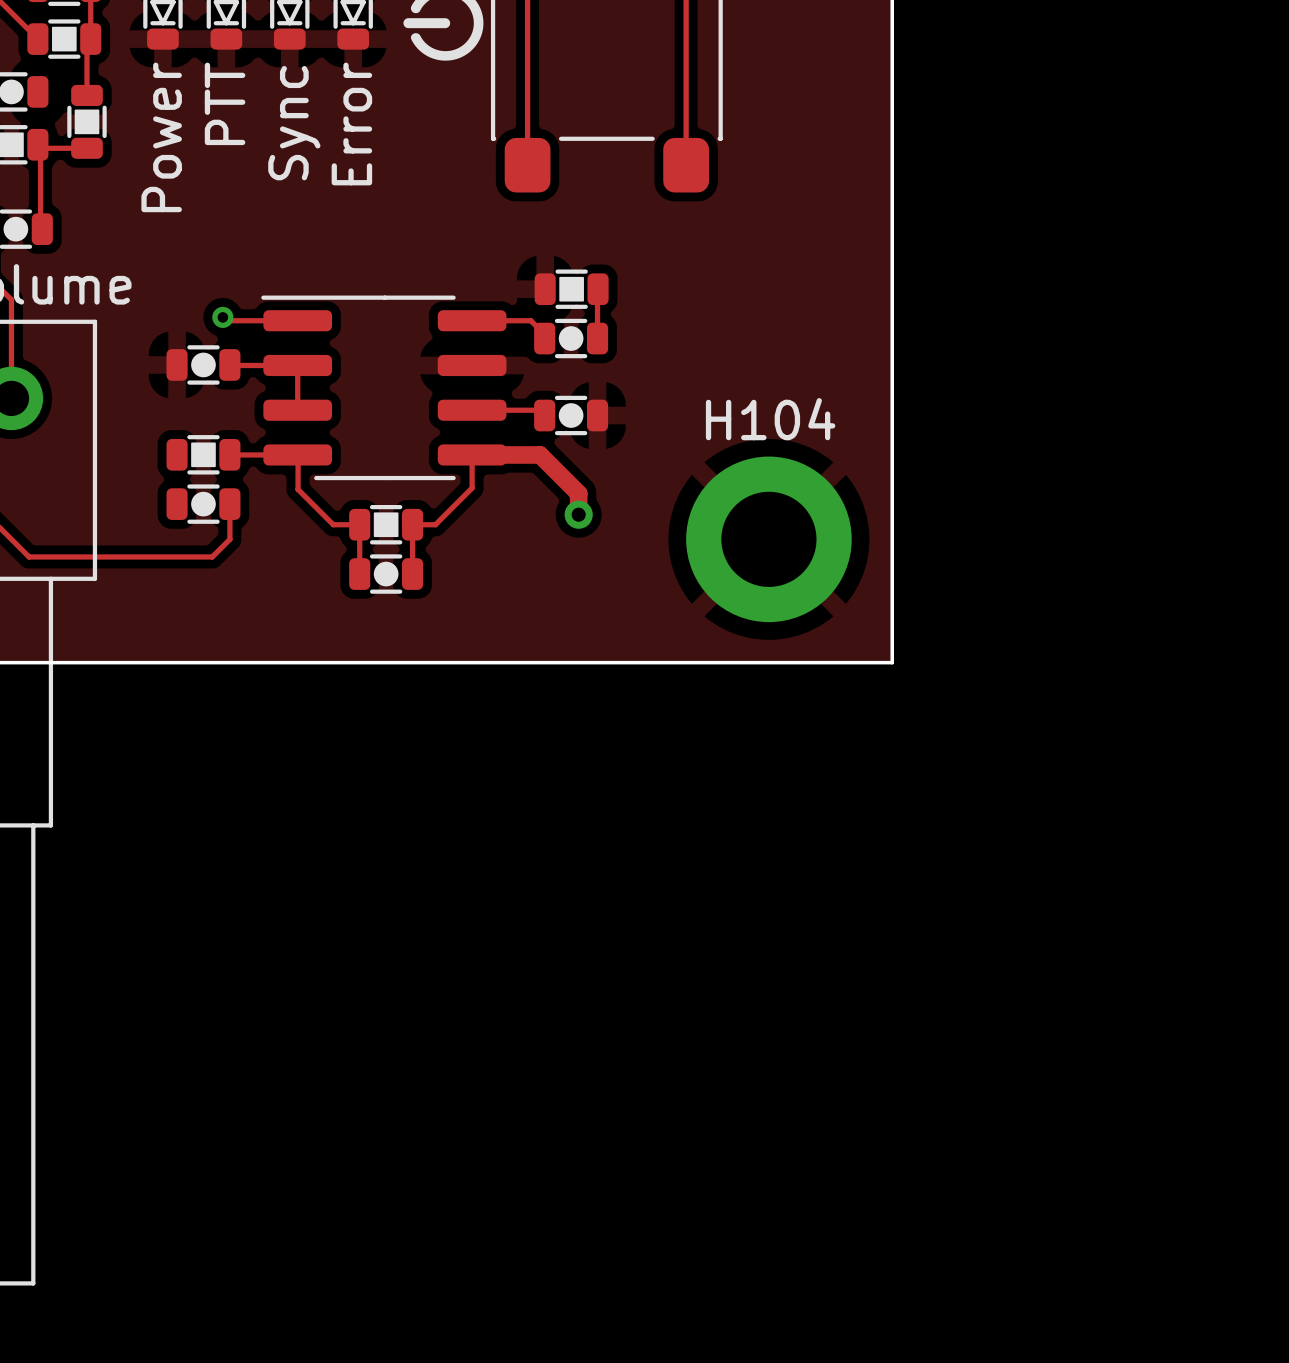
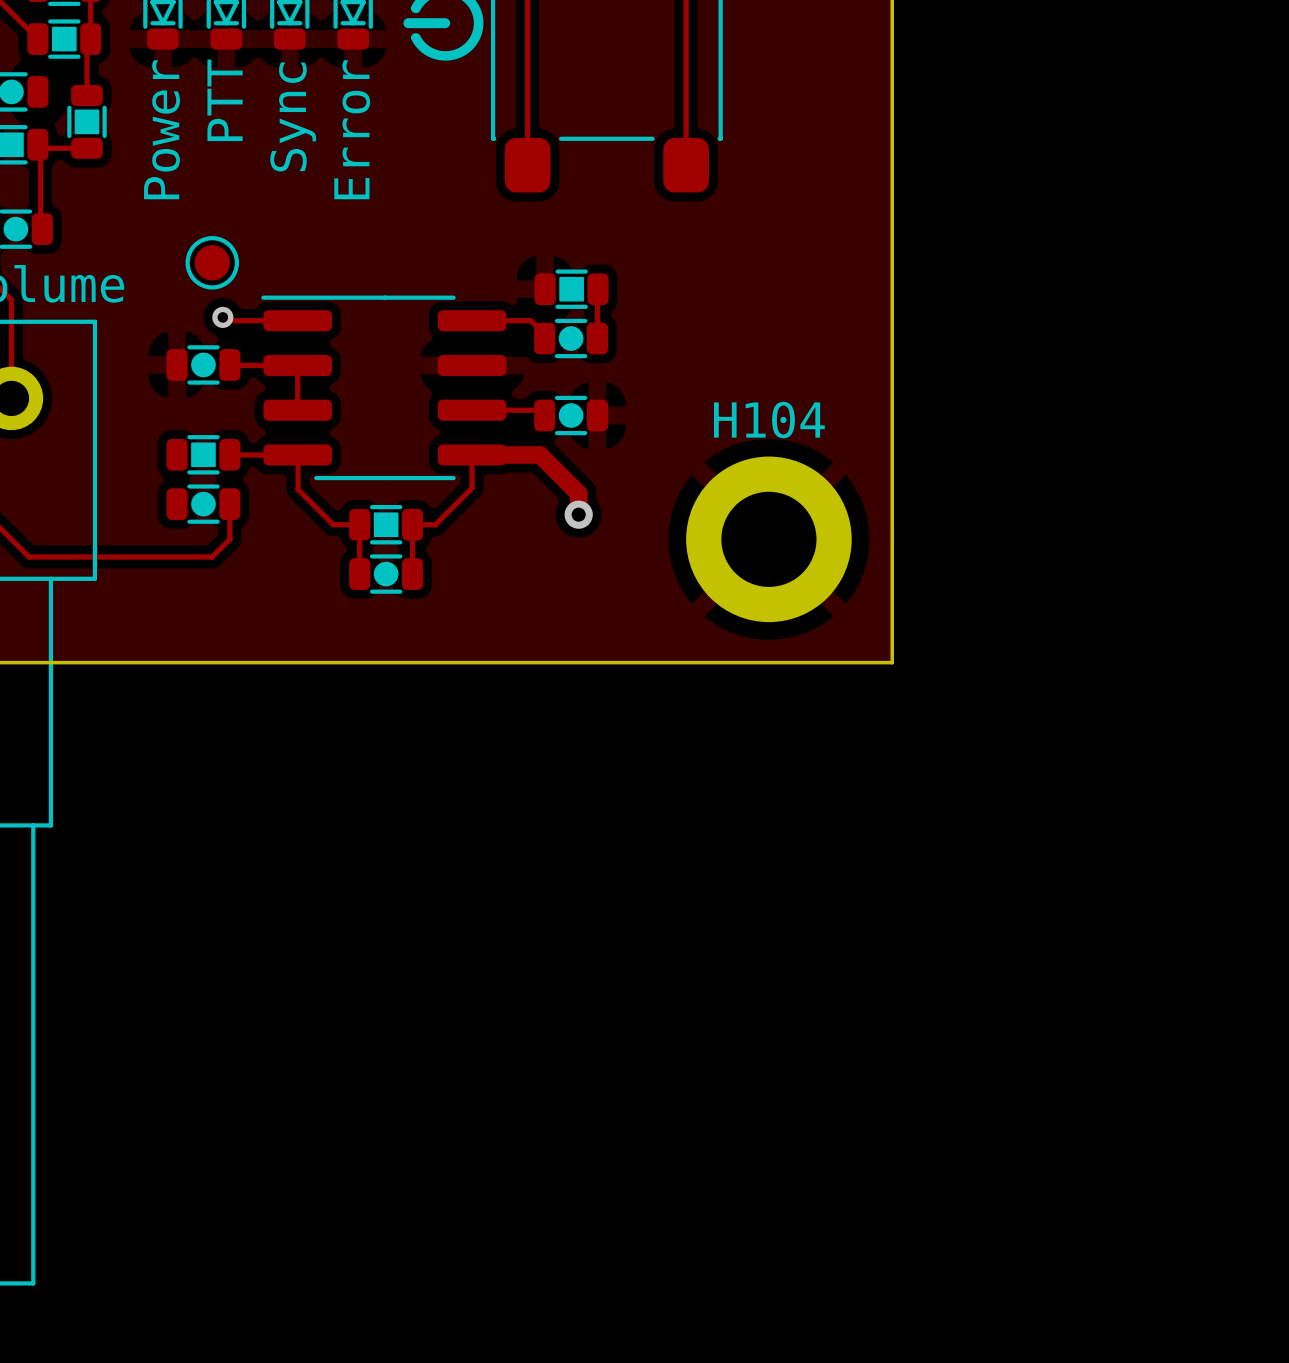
part: none -> (212, 262)

